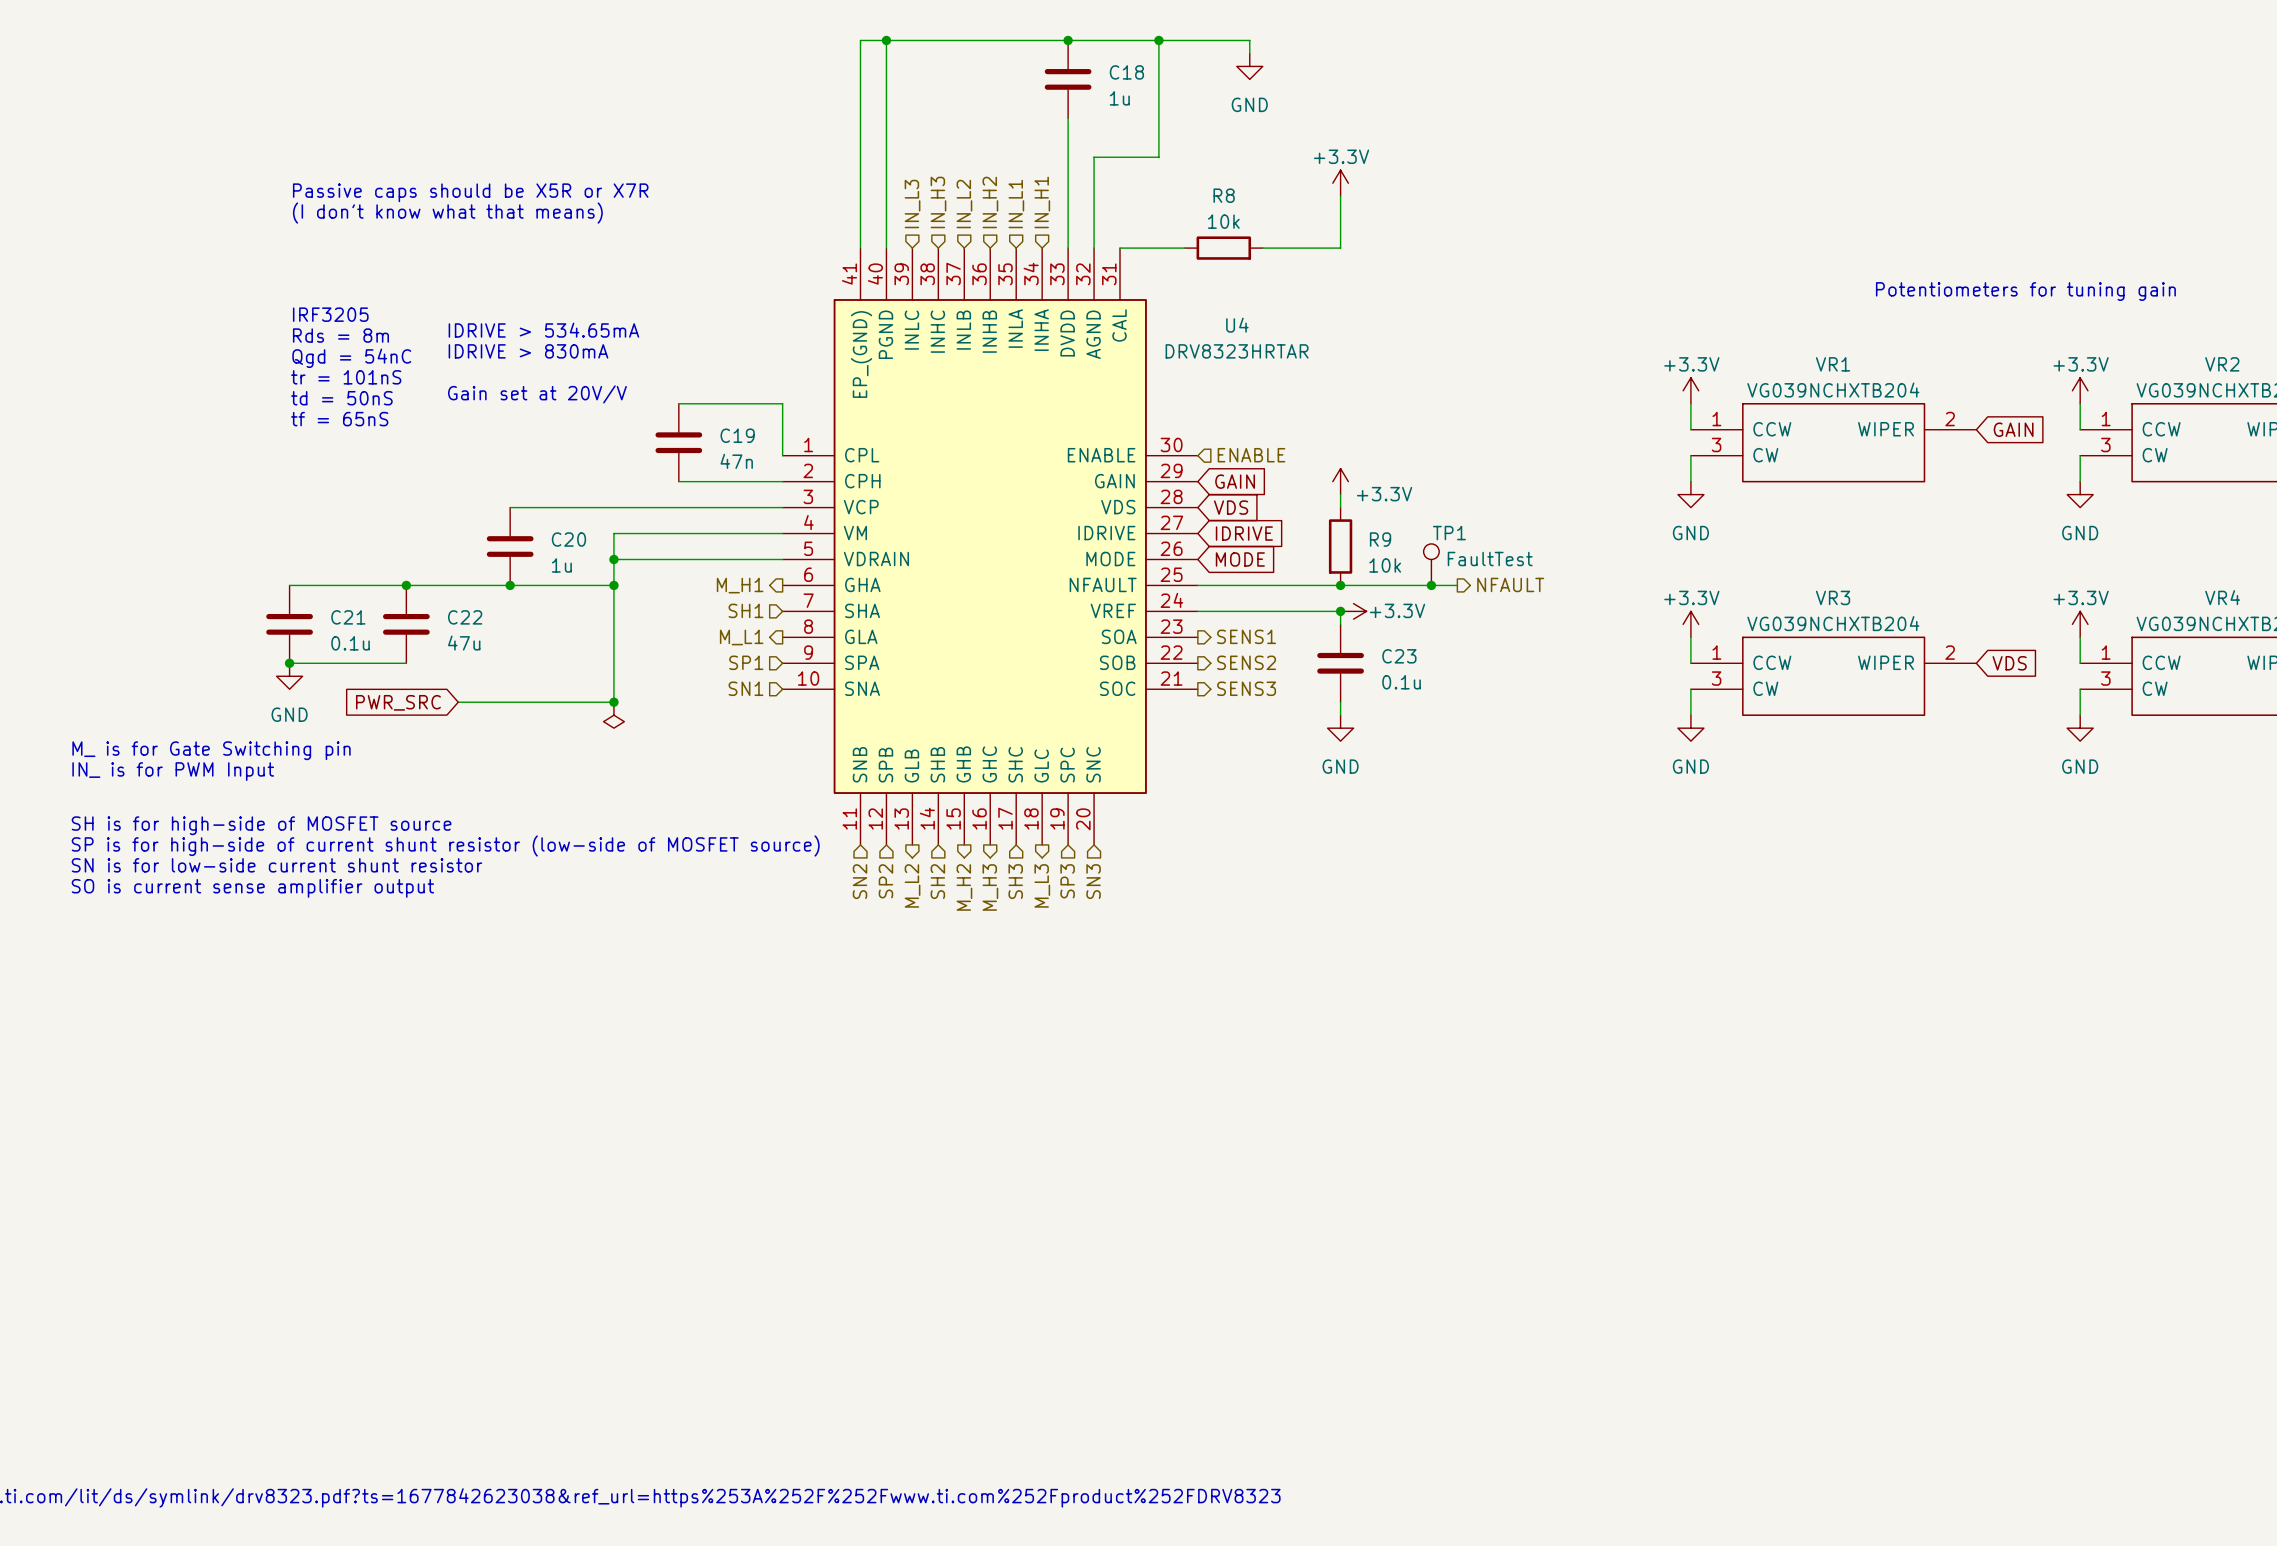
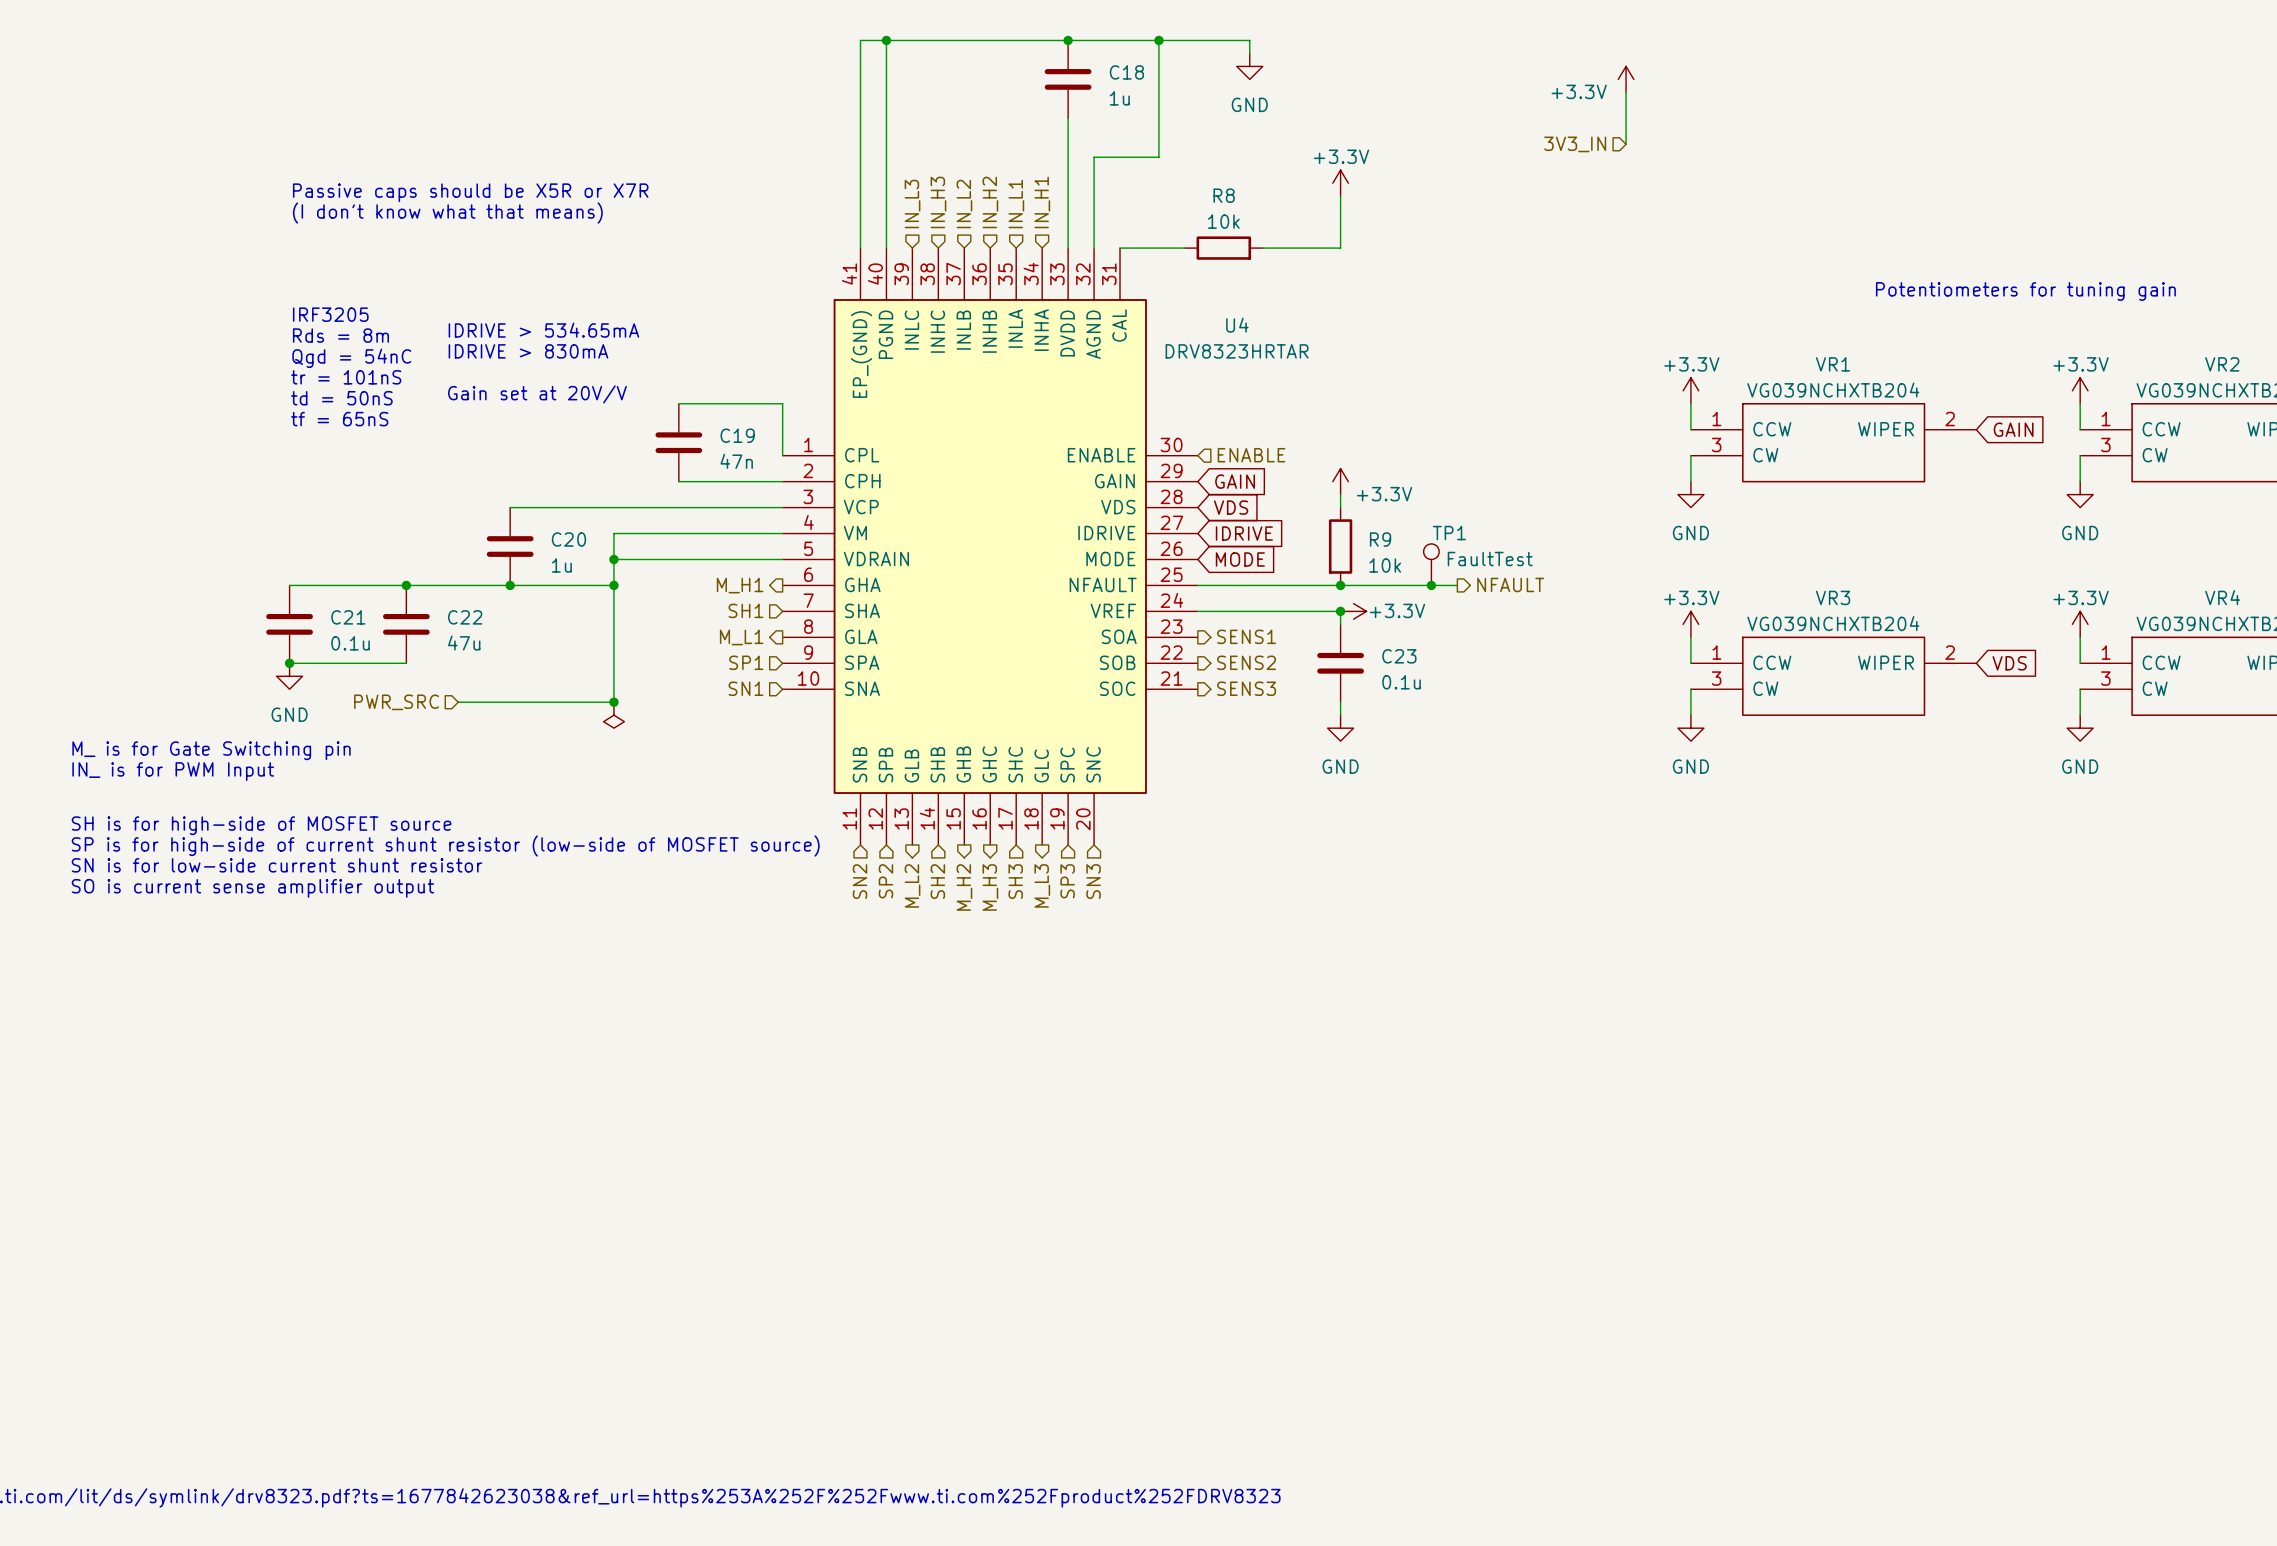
power symbol: none -> +3.3V (1626, 79)
wire: none -> (1626, 92) (1626, 144)
hierarchical label: none -> 3V3_IN (1575, 144)
hierarchical label: none -> PWR_SRC (396, 702)
global label: PWR_SRC (398, 702) -> none

